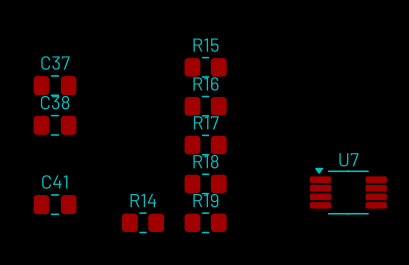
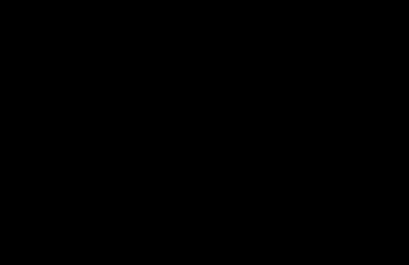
R15: (205, 67) -> none
C37: (54, 85) -> none
R16: (205, 106) -> none
C38: (54, 125) -> none
R17: (205, 145) -> none
R18: (205, 183) -> none
U7: (348, 191) -> none
C41: (54, 204) -> none
R14: (143, 222) -> none
R19: (205, 222) -> none

